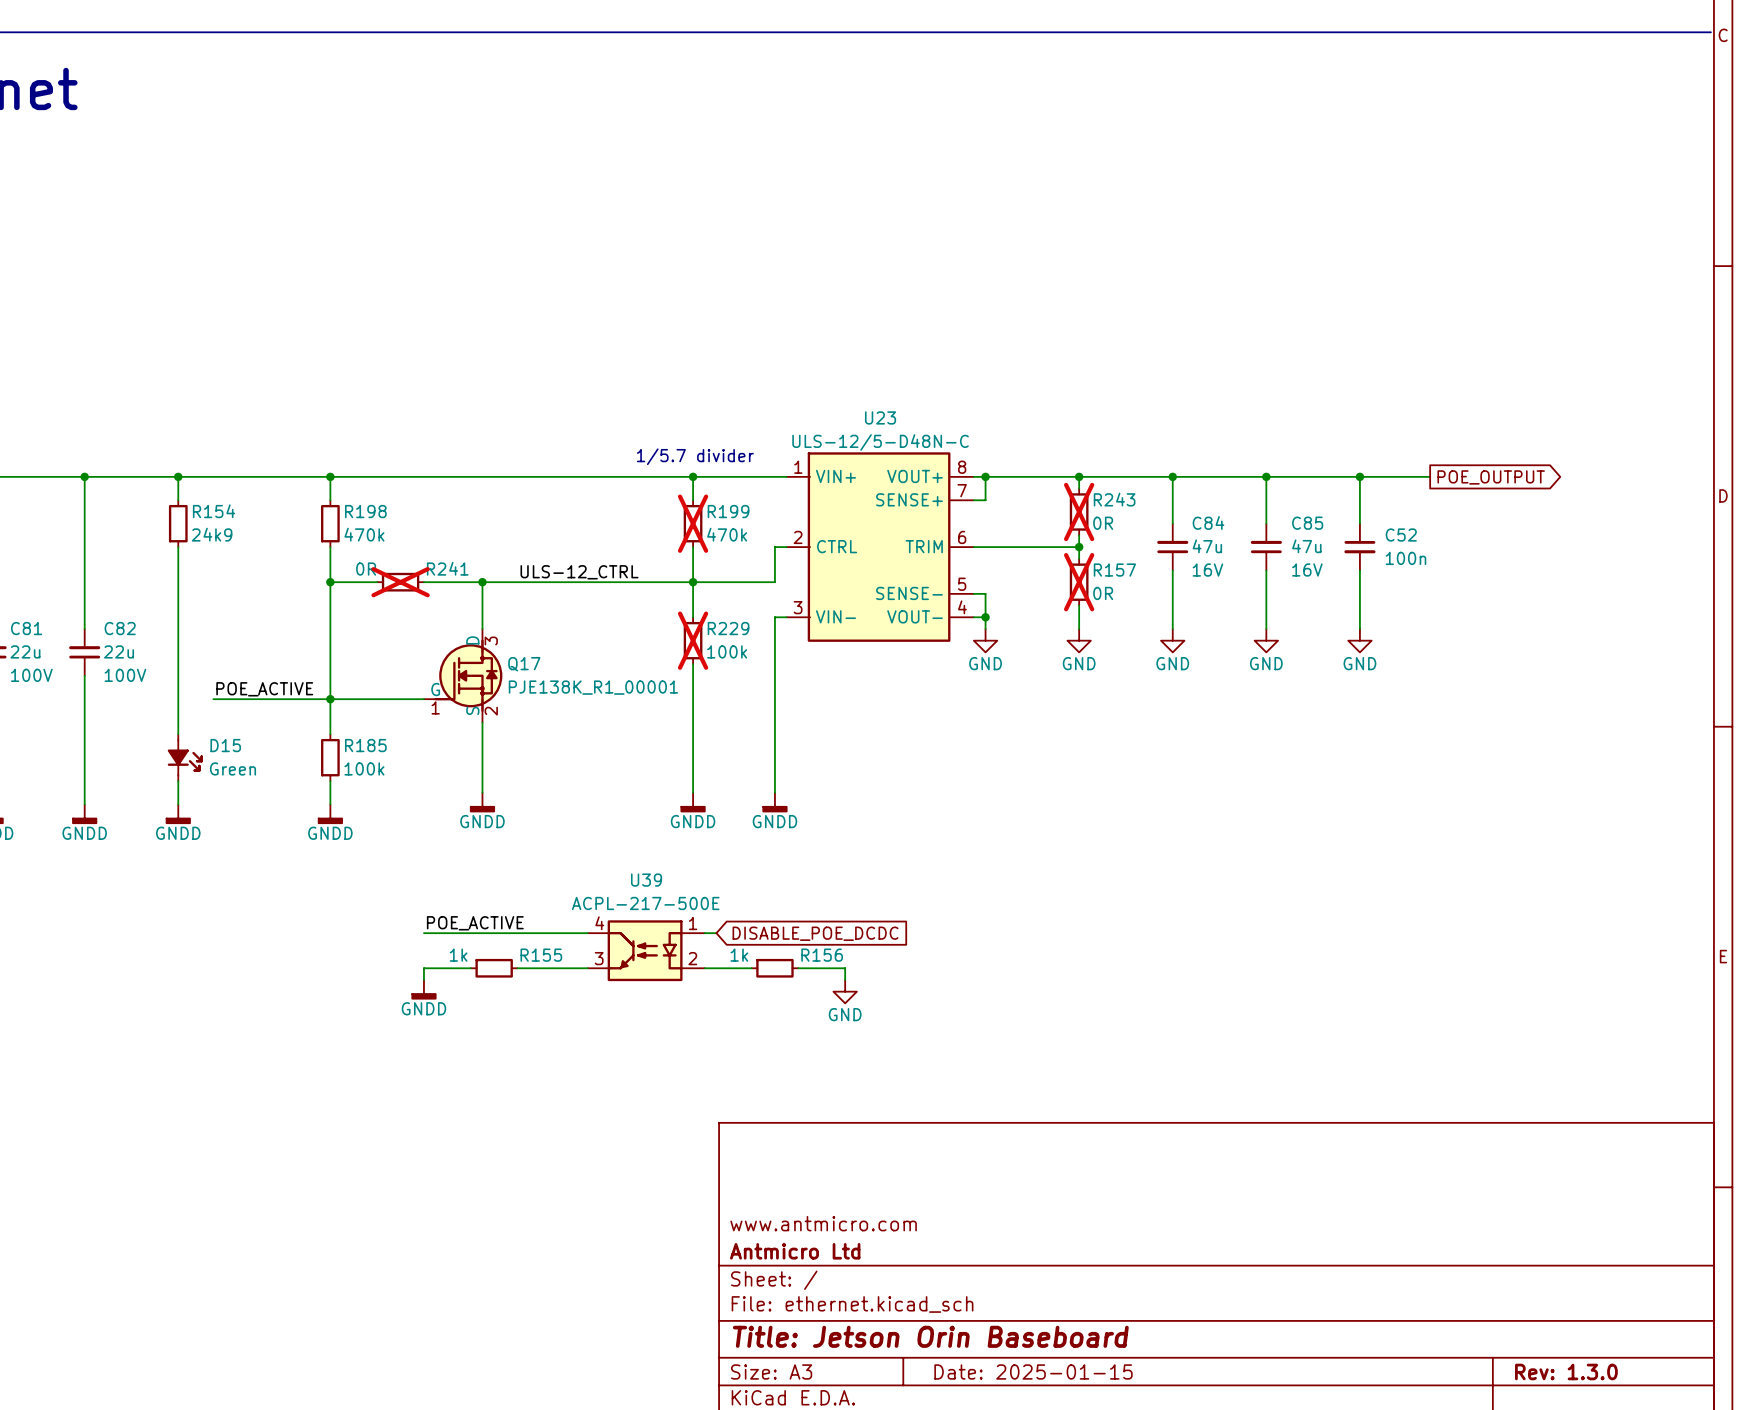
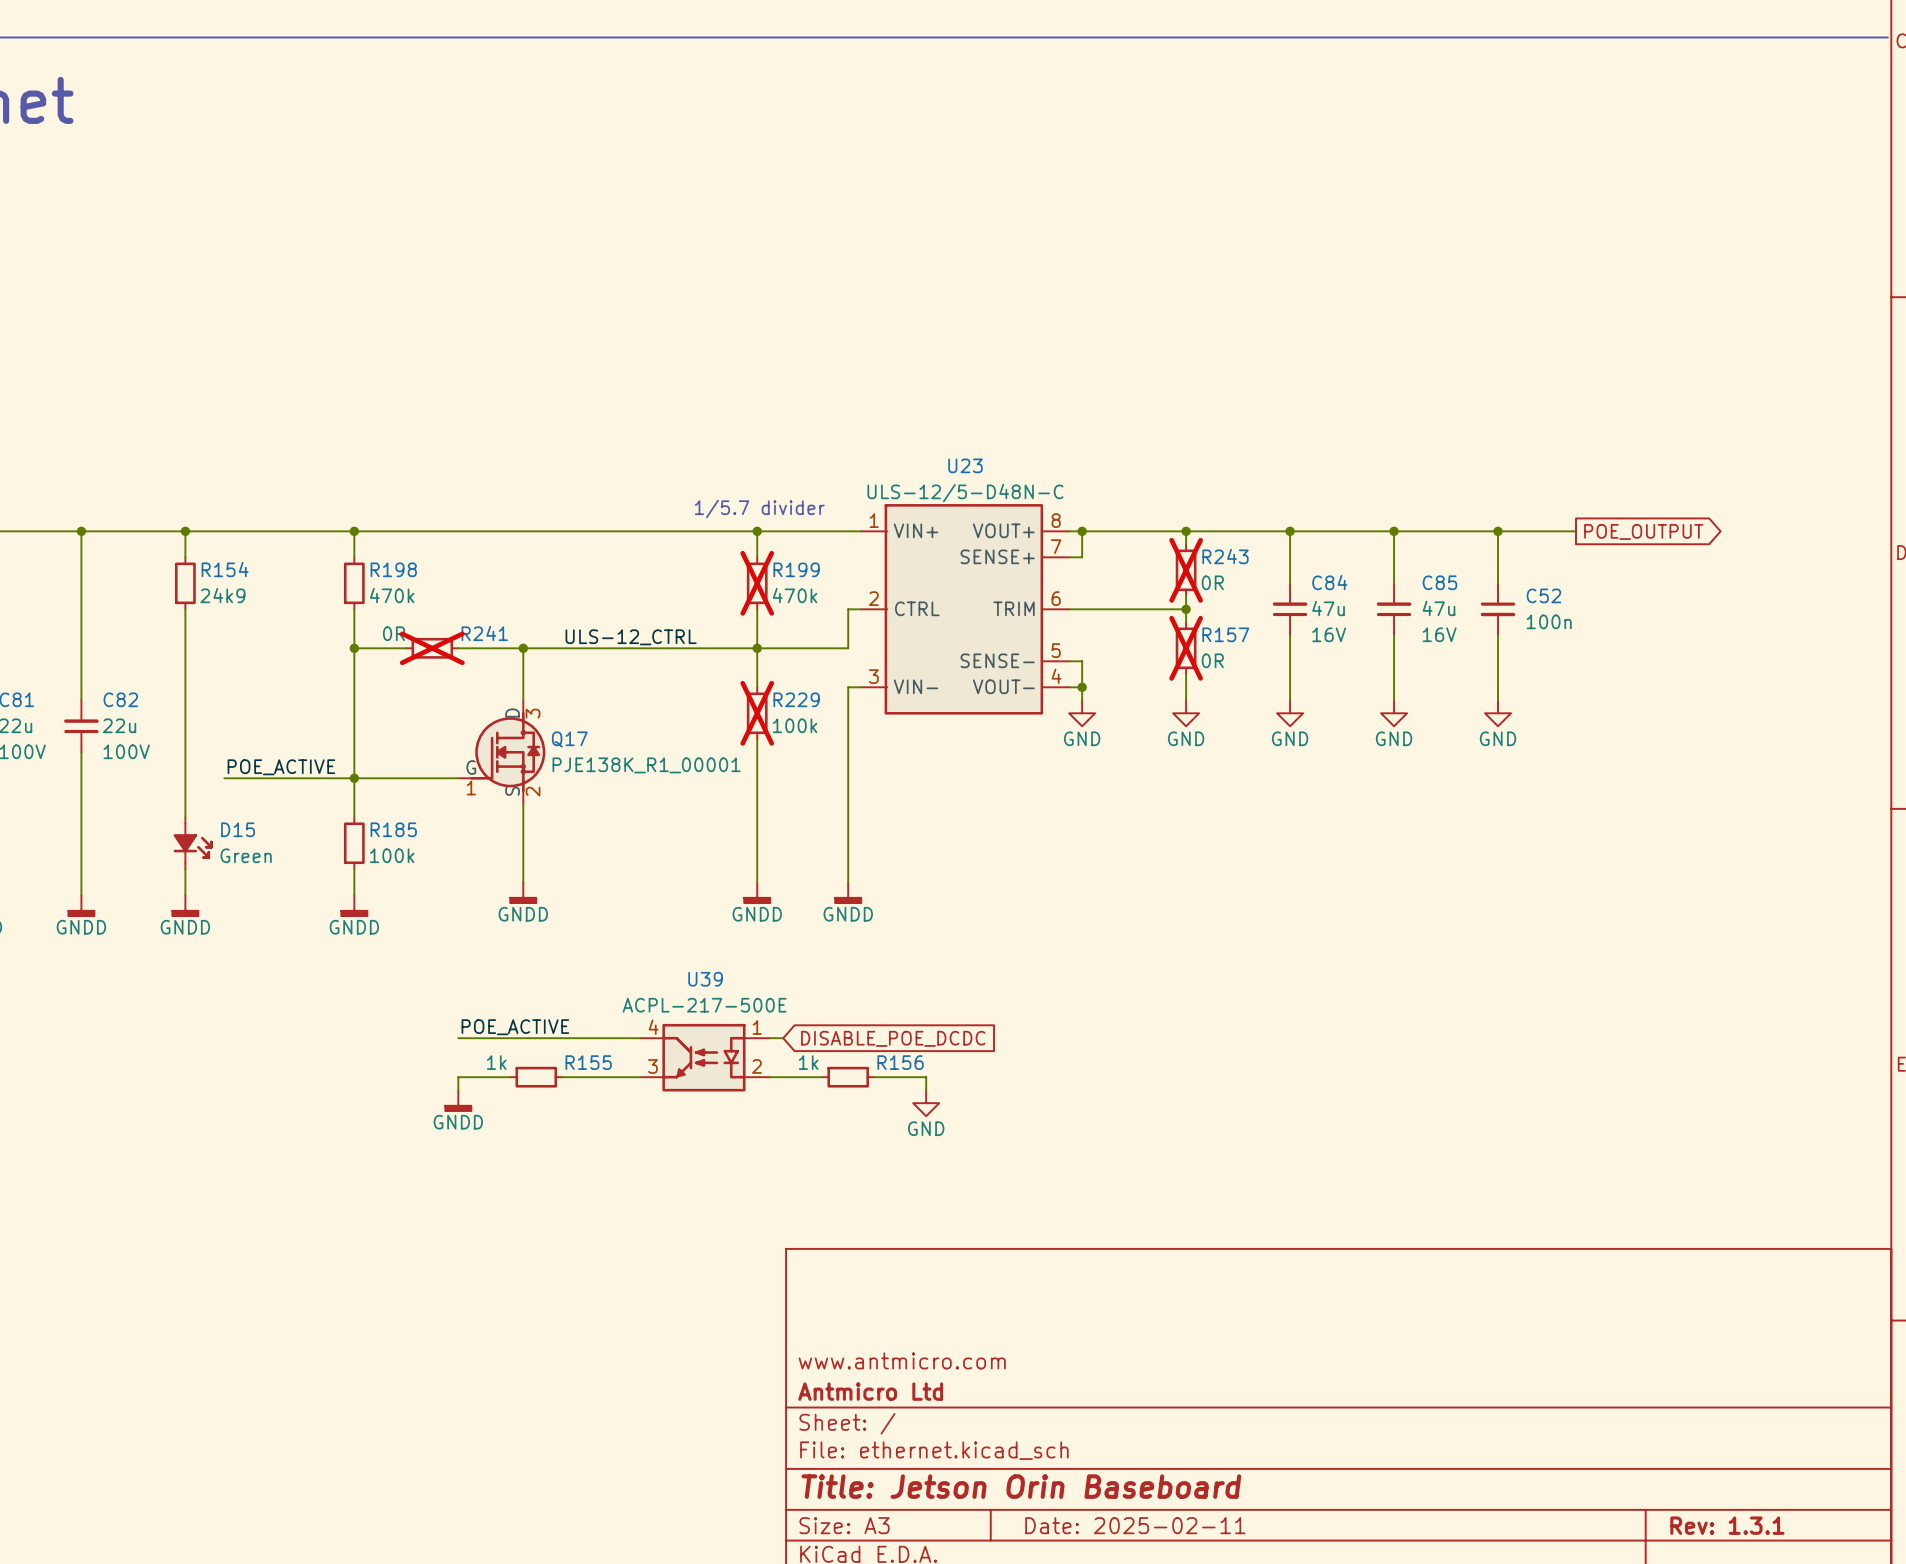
title block: Date: 2025-01-15 (1033, 1371) -> Date: 2025-02-11 (1135, 1525)
title block: Rev: 1.3.0 (1566, 1371) -> Rev: 1.3.1 (1727, 1525)

